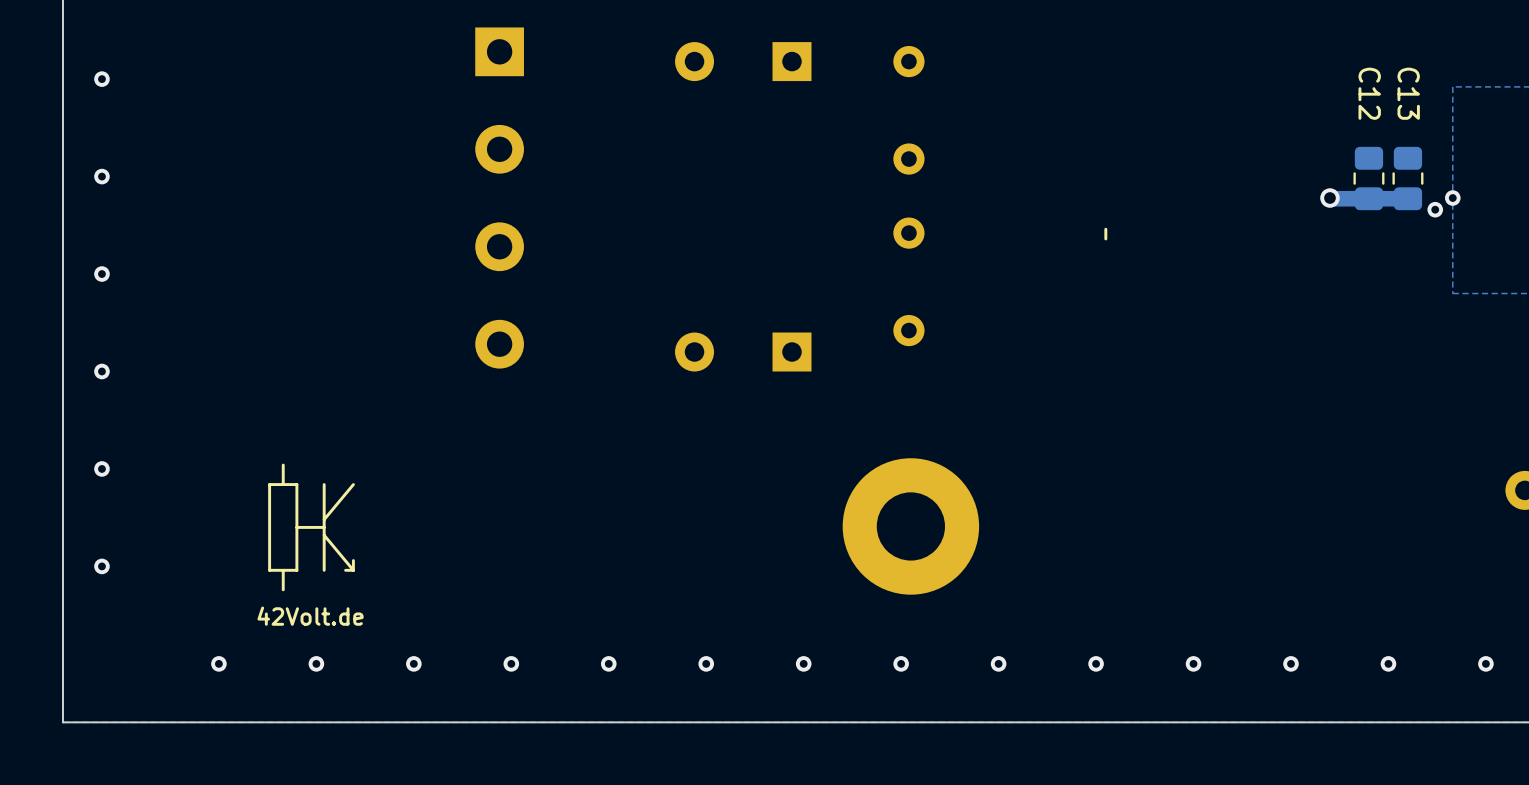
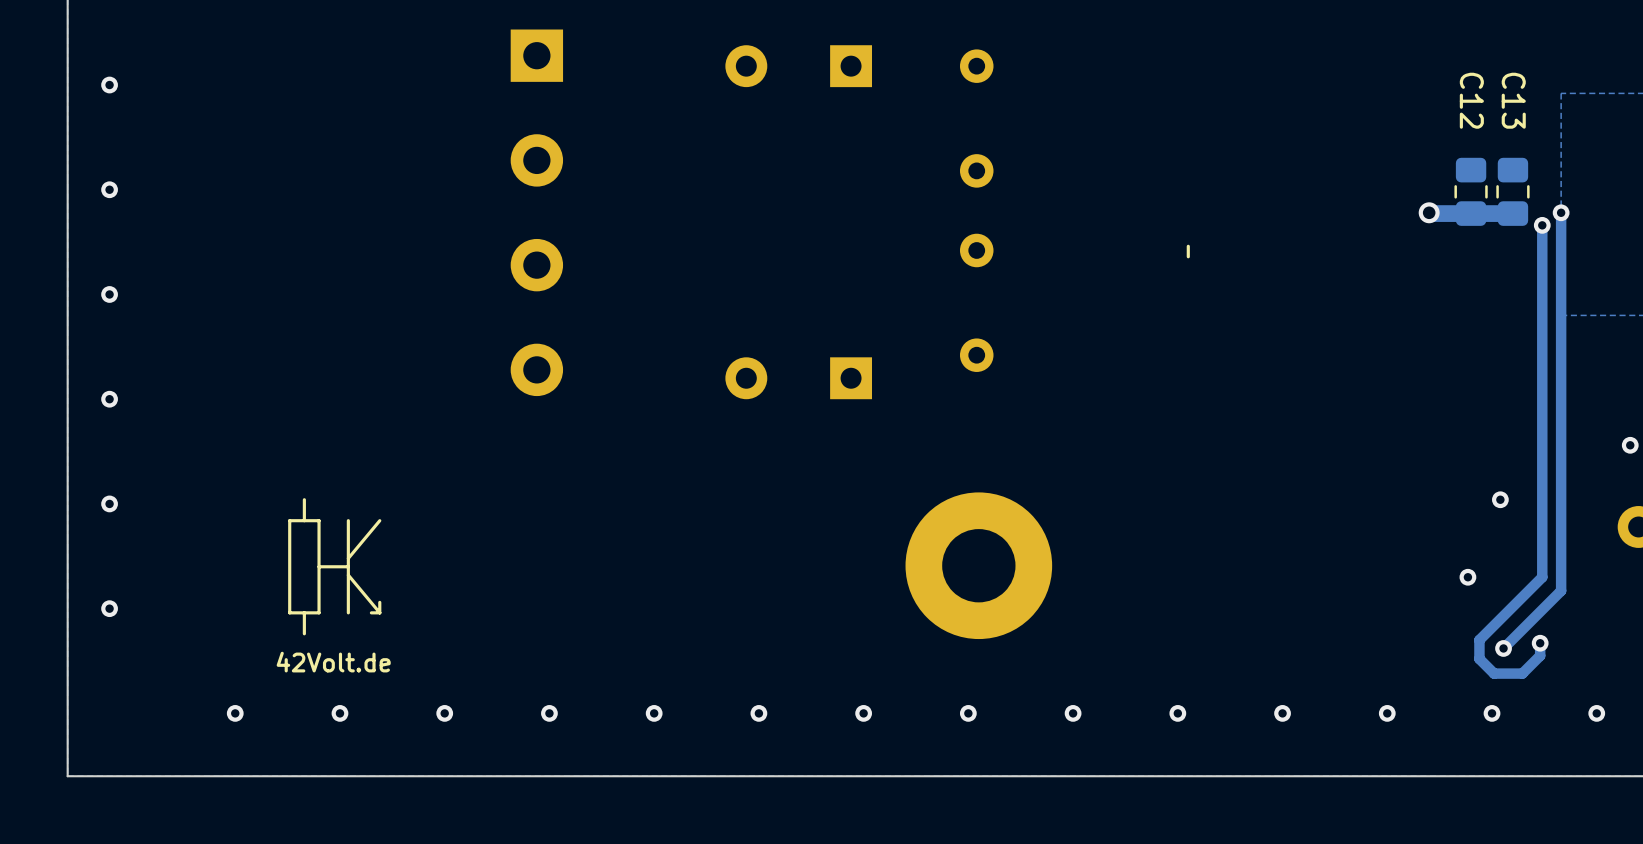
track: none -> (1561, 212) (1561, 590) (1503, 648)
track: none -> (1542, 225) (1542, 577) (1479, 640) (1479, 658) (1494, 673) (1522, 673) (1540, 655) (1540, 643)
via: none -> (1630, 445)
via: none -> (1500, 499)
via: none -> (1467, 577)
via: none -> (1540, 643)
via: none -> (1503, 648)

